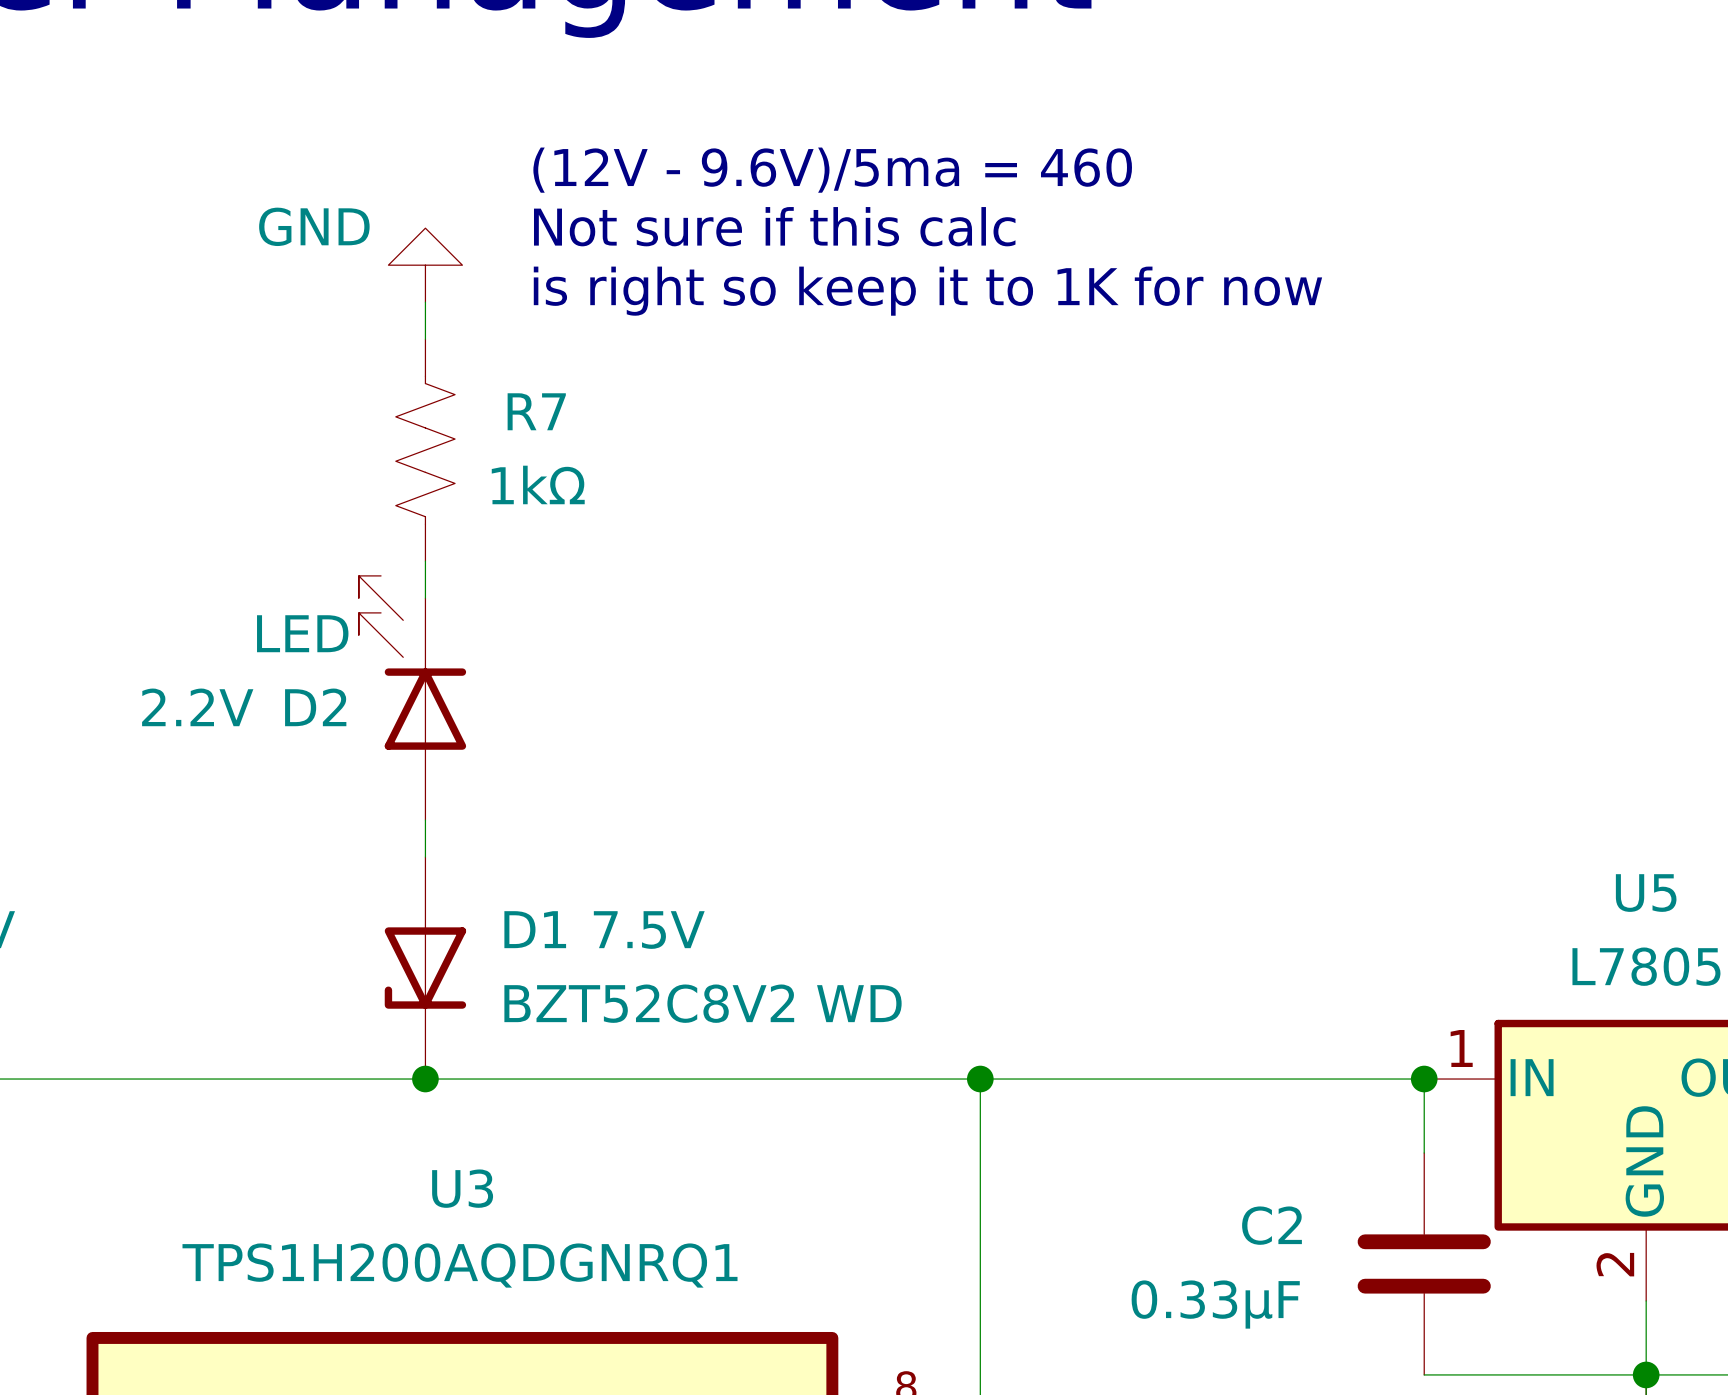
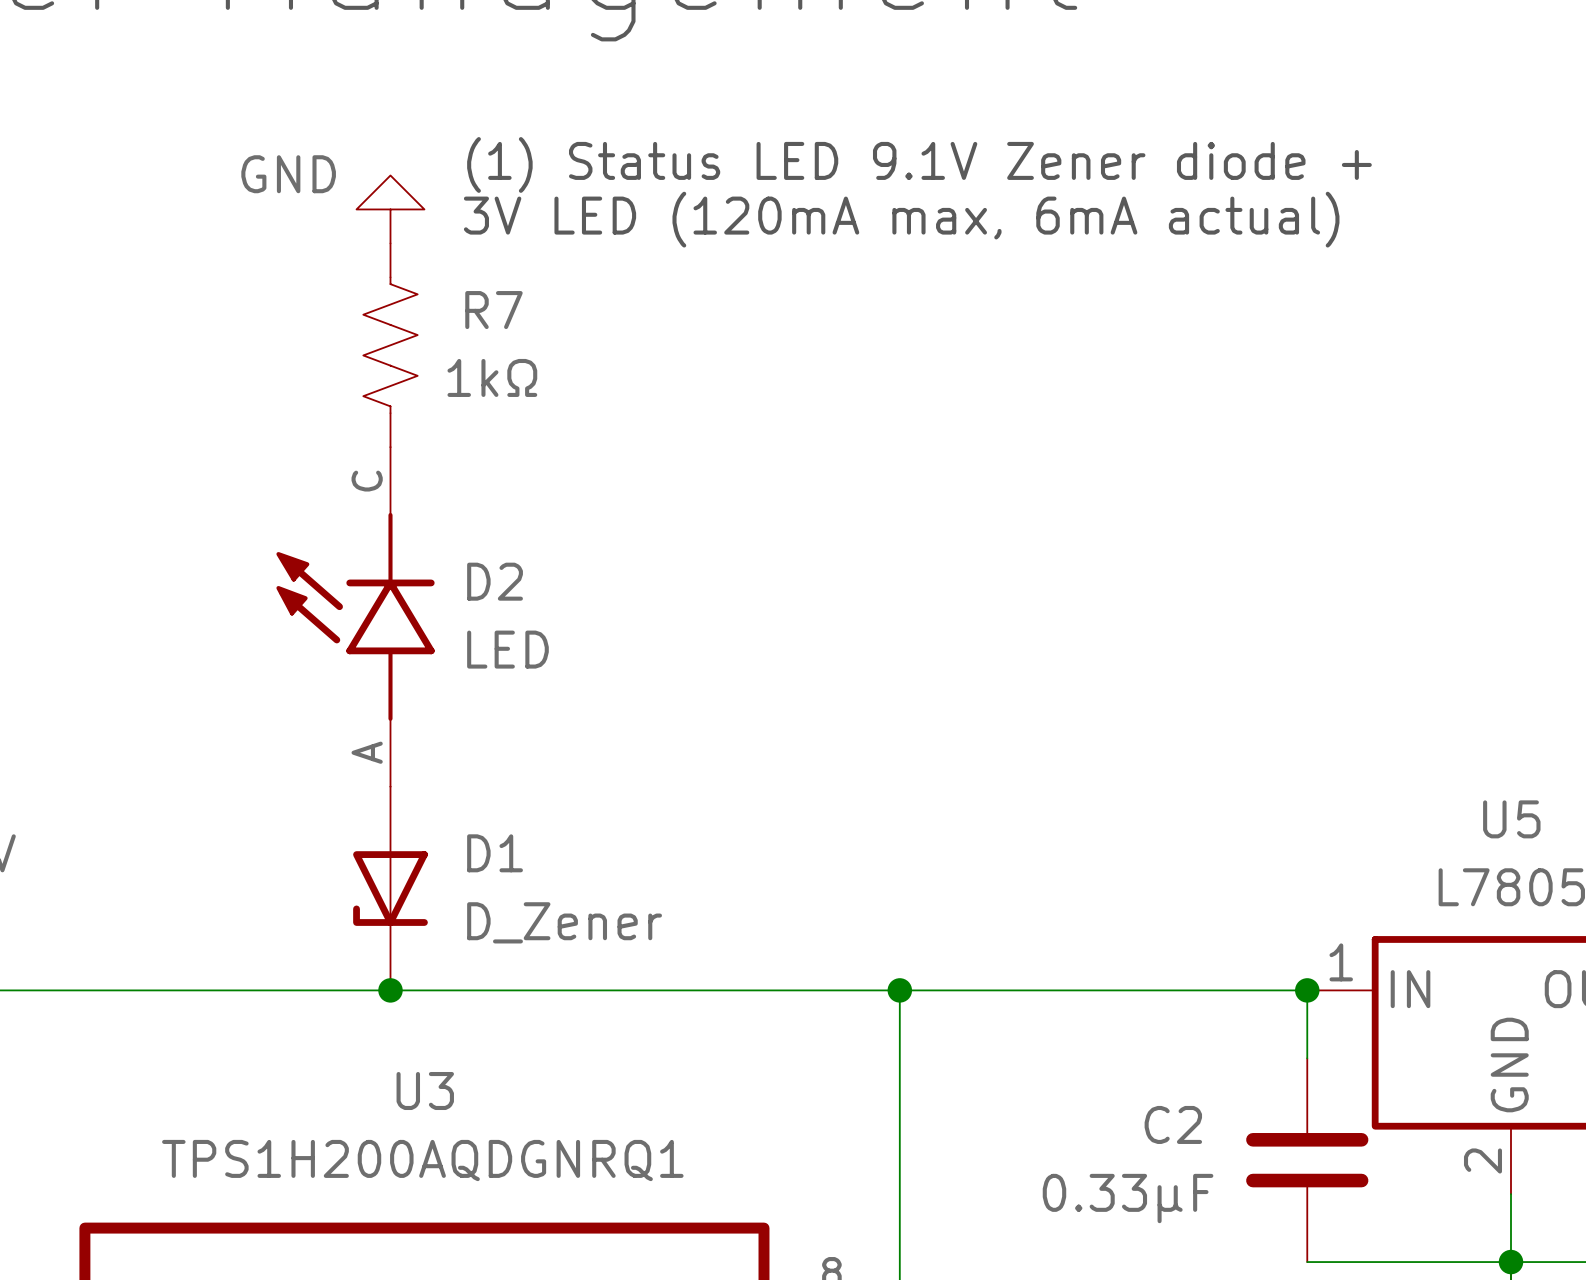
text: (12V - 9.6V)/5ma = 460 (832, 170) -> none
text: none -> (1) Status LED 9.1V Zener diode + (919, 164)
text: Not sure if this calc (774, 226) -> none
text: none -> 3V LED (120mA max, 6mA actual) (901, 219)
power symbol position: GND (425, 265) -> GND (390, 209)
text: is right so keep it to 1K for now (927, 291) -> none
wire: (425, 302) (425, 339) -> none
R7 position: (425, 450) -> (390, 345)
D2 symbol: [358, 575, 467, 821] -> [276, 447, 435, 787]
D2 value position: LED (302, 633) -> LED (507, 649)
D2 text: 2.2V (197, 707) -> none
D2 name position: D2 (315, 707) -> D2 (495, 581)
D1 text: 7.5V (649, 930) -> none
D1 value: BZT52C8V2 WD (703, 1003) -> D_Zener (564, 922)

